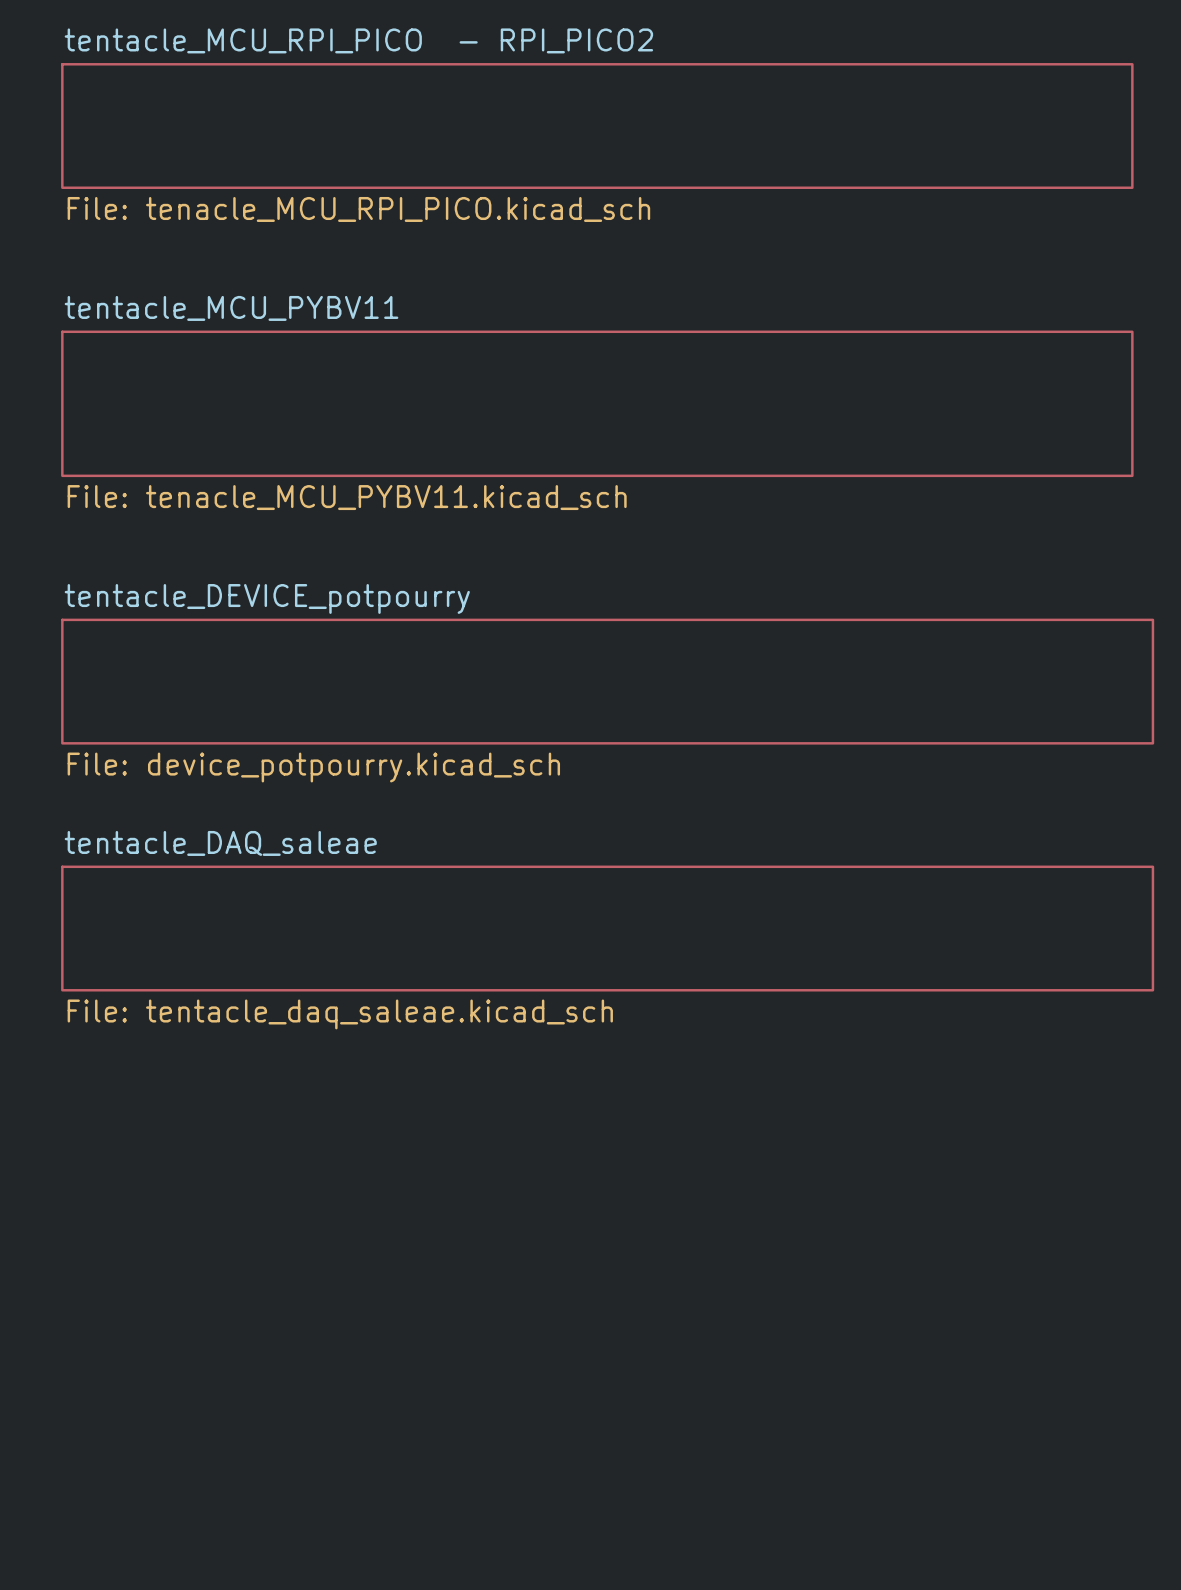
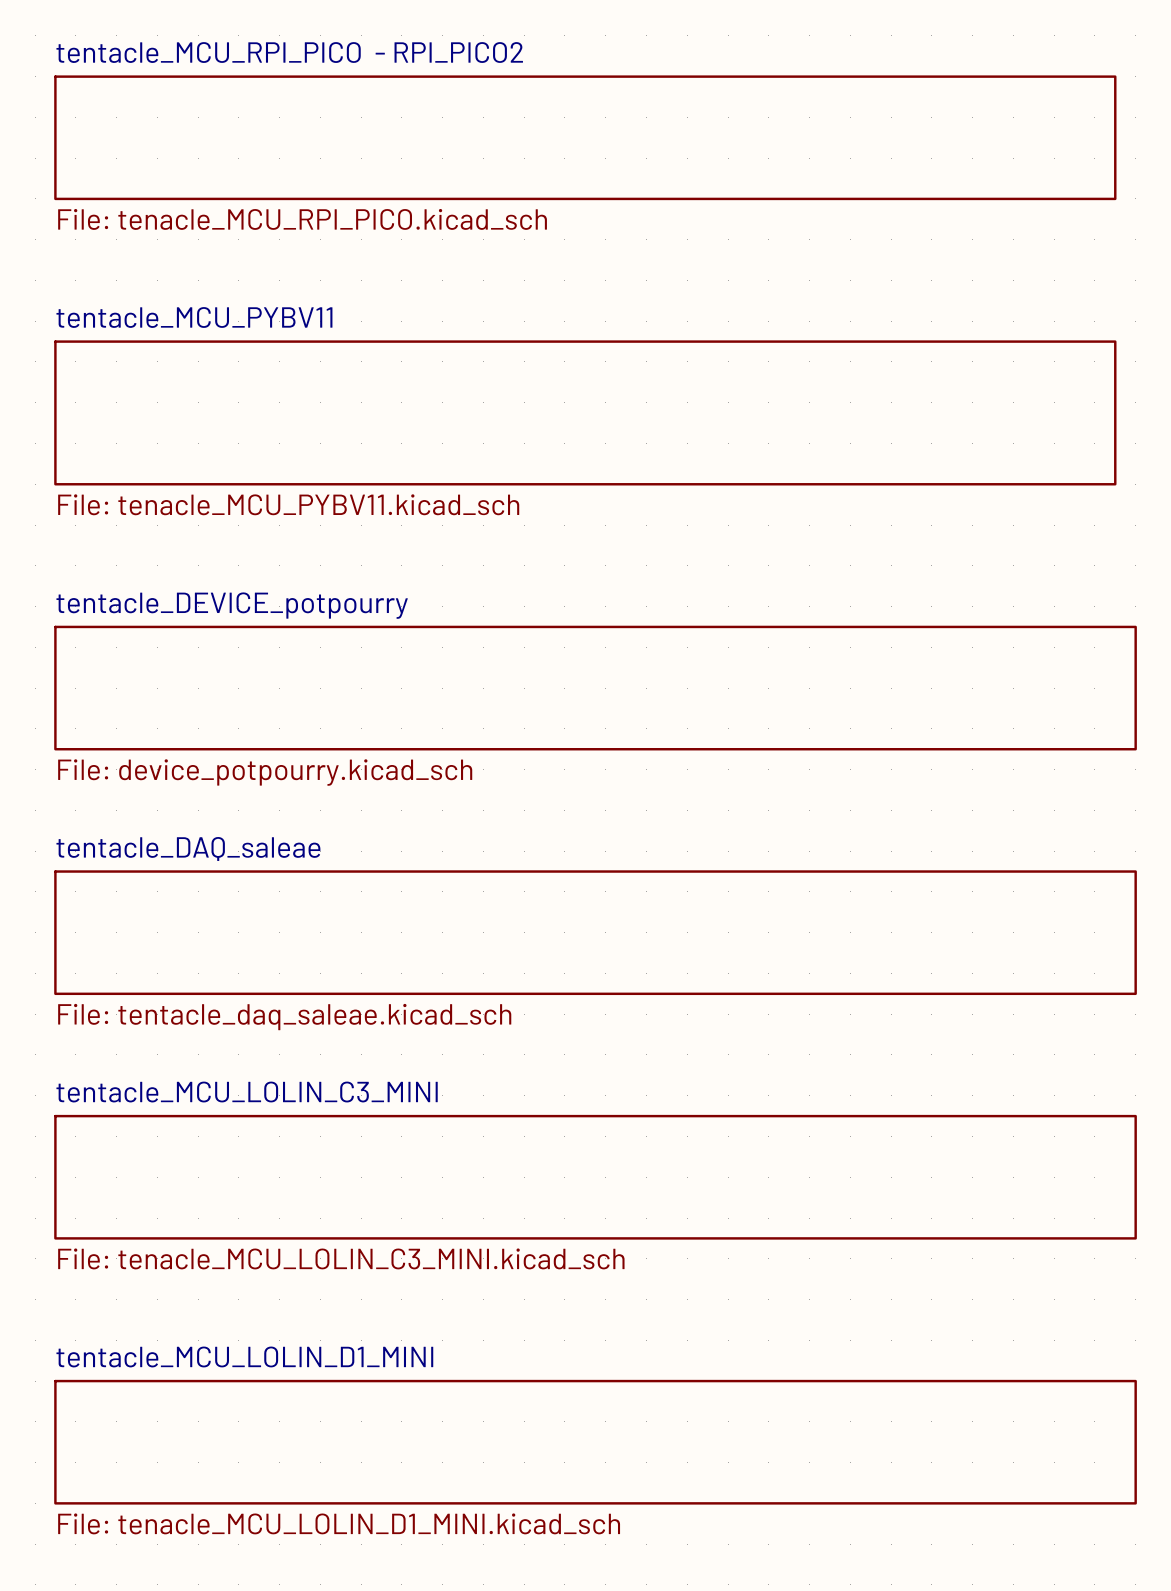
sheet tentacle_MCU_LOLIN_C3_MINI: none -> File: tenacle_MCU_LOLIN_C3_MINI.kicad_sch (595, 1177)
sheet tentacle_MCU_LOLIN_D1_MINI: none -> File: tenacle_MCU_LOLIN_D1_MINI.kicad_sch (595, 1442)

